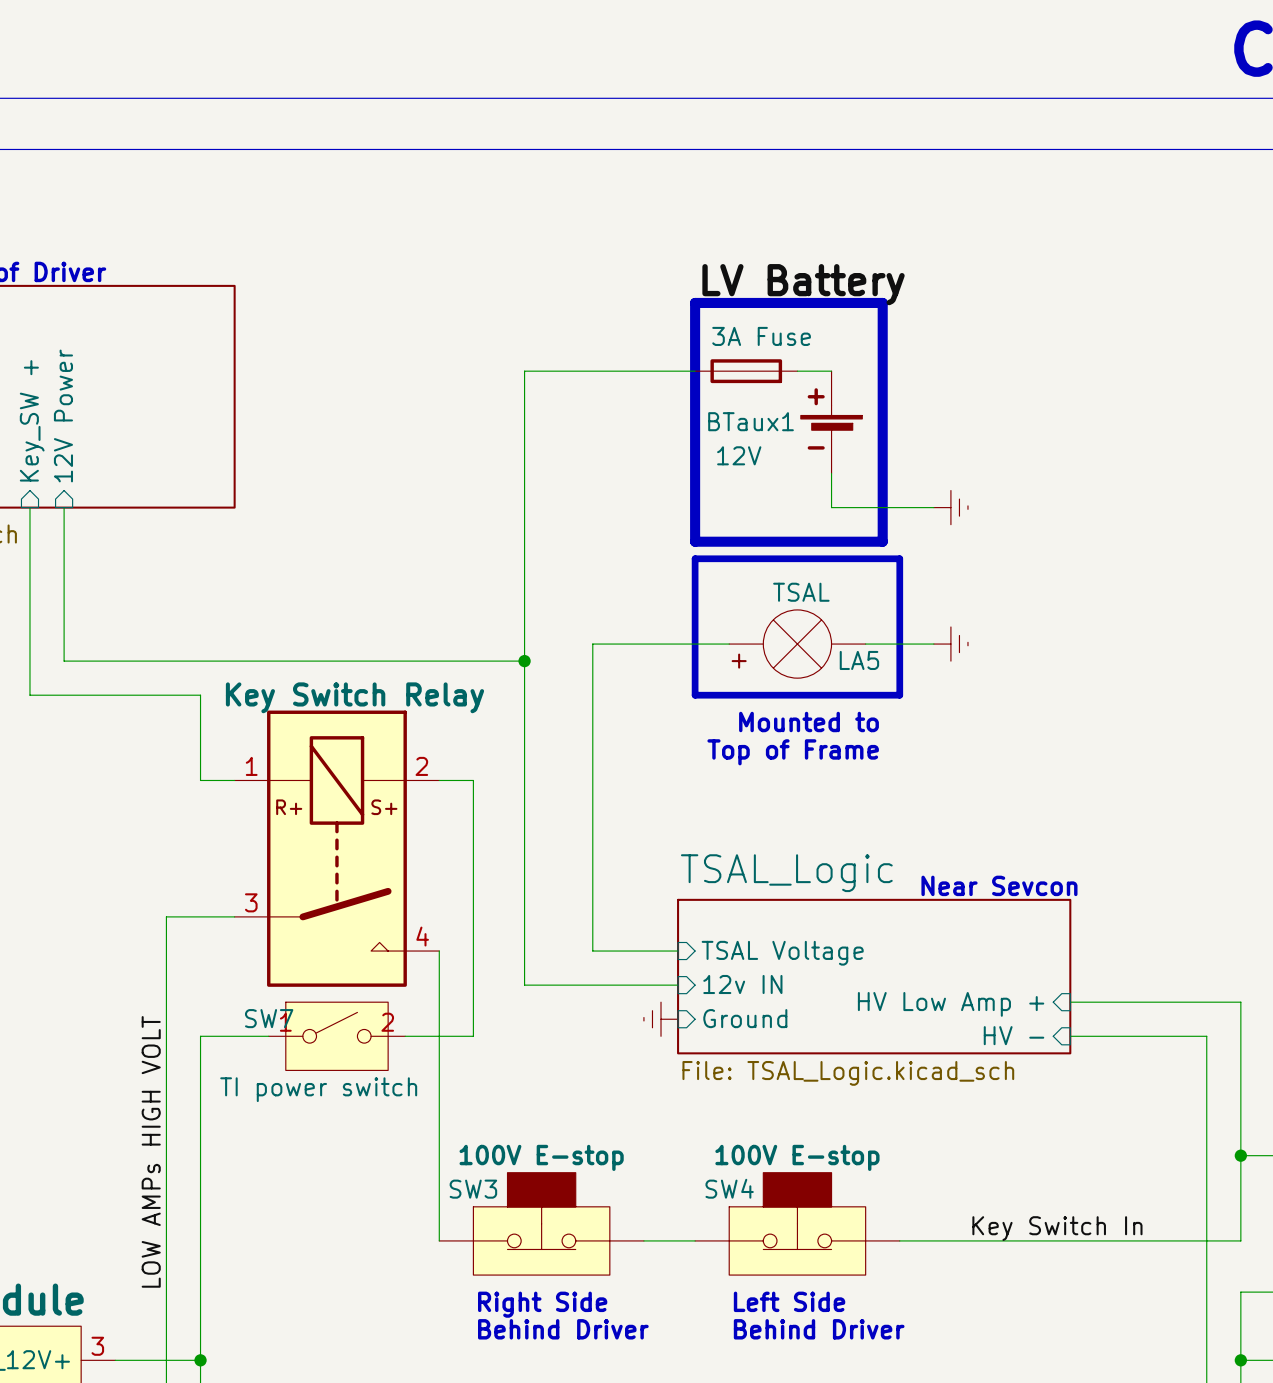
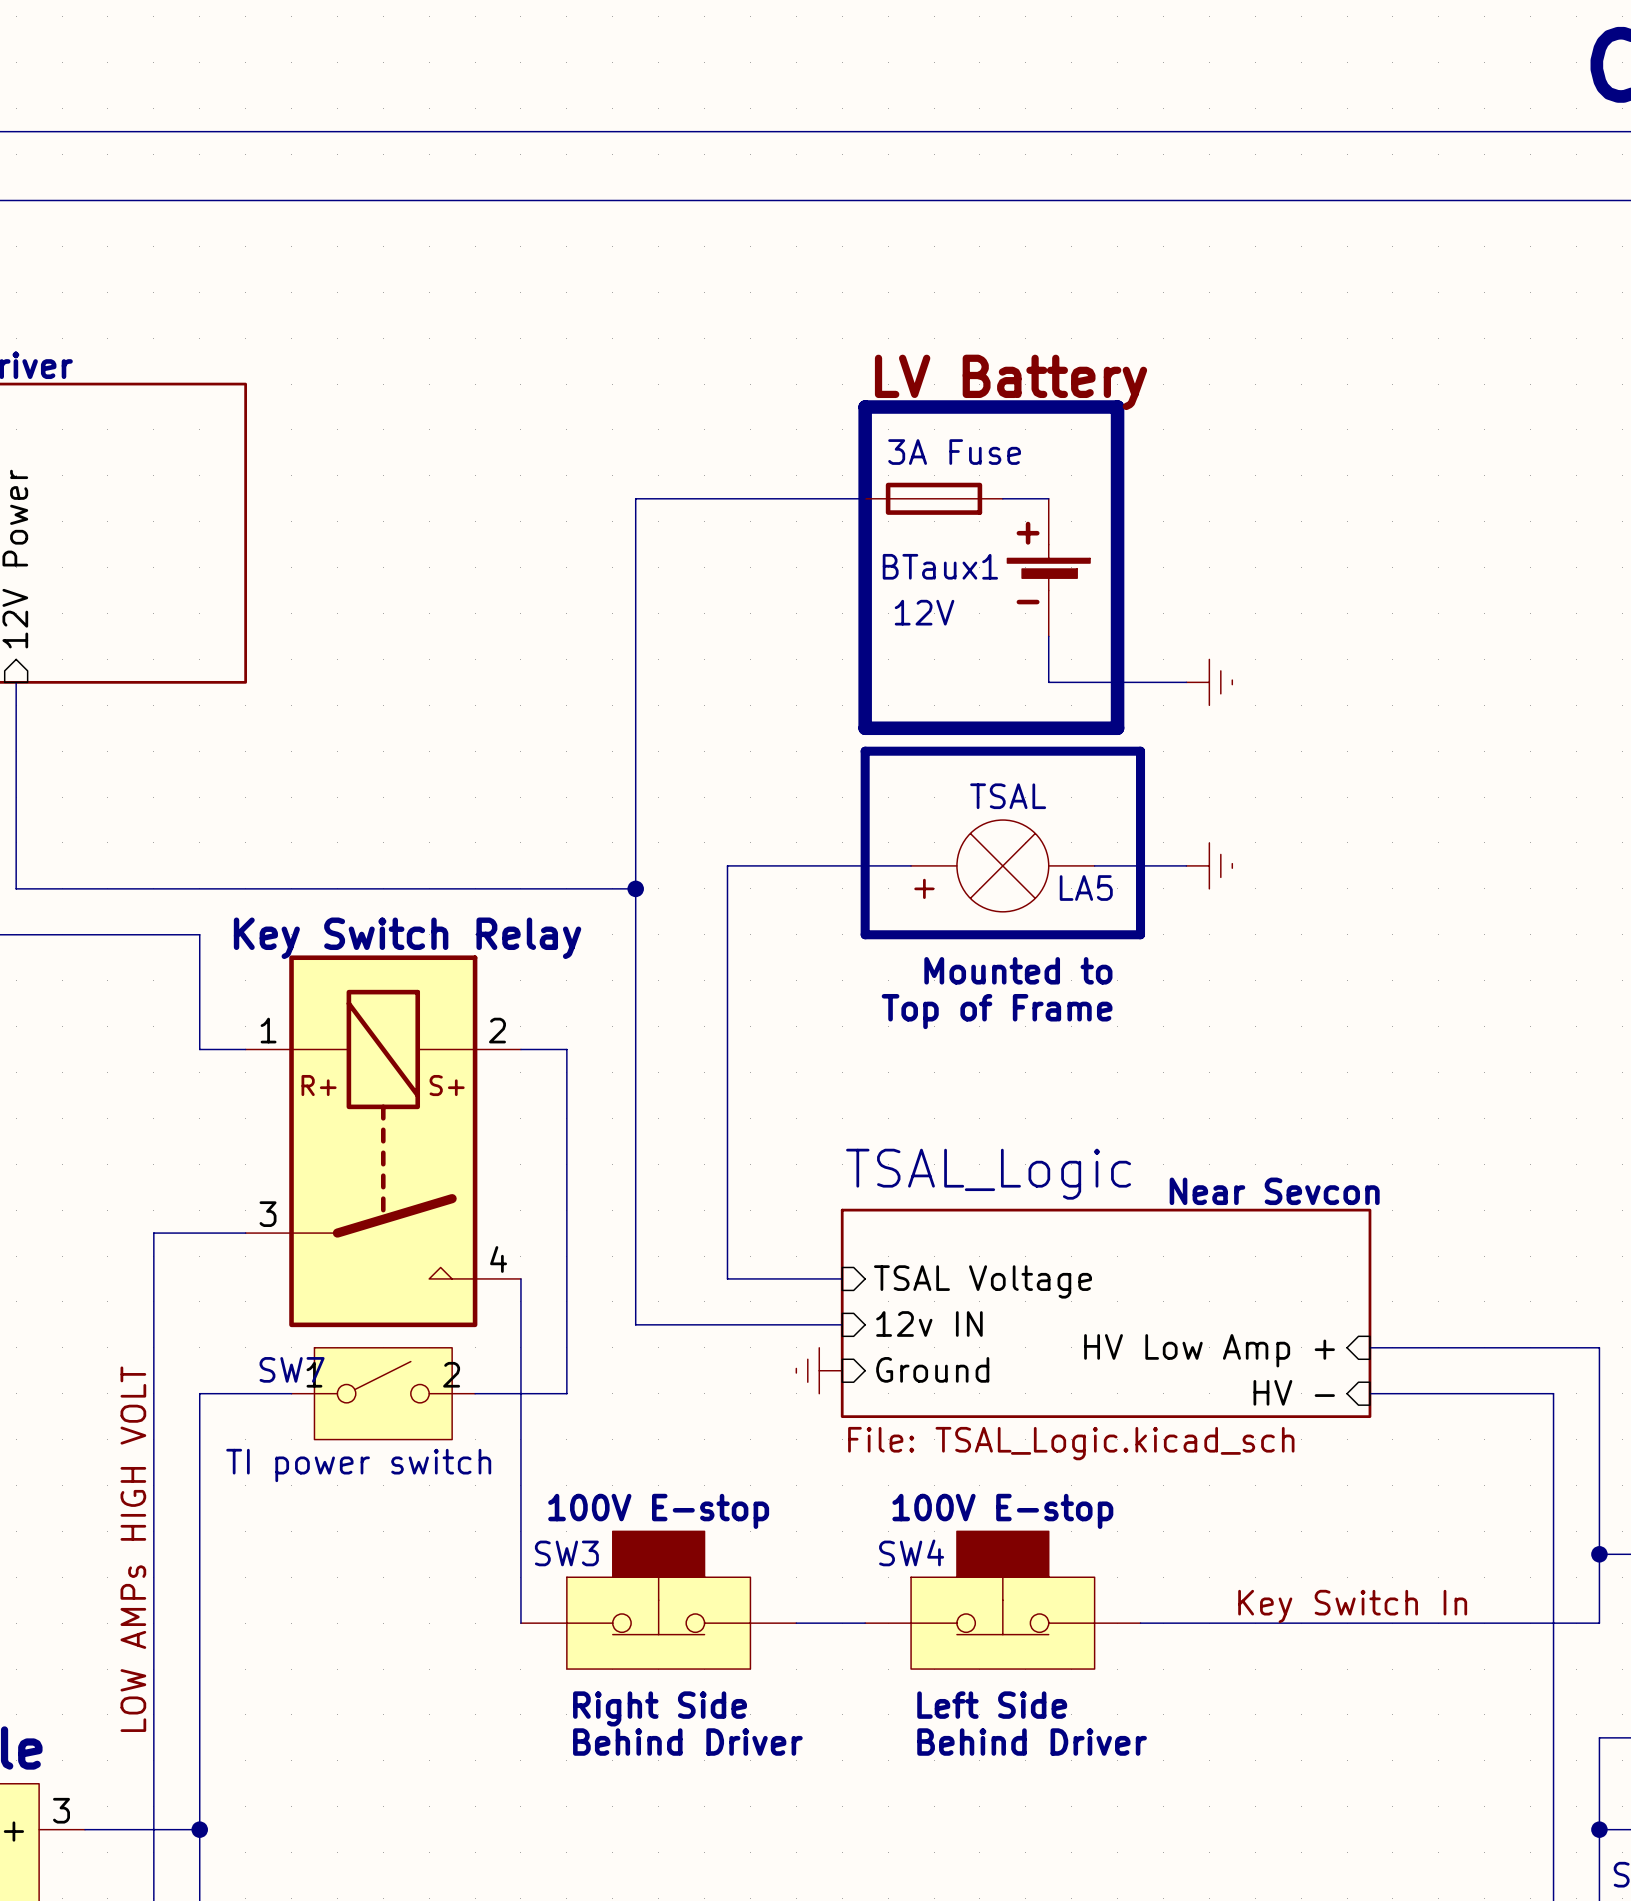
wire: (439, 1206) (439, 1240) -> none
wire: (1240, 1206) (1240, 1240) (899, 1240) -> (1599, 1623) (1140, 1623)
SW3 position: (541, 1223) -> (658, 1600)
SW4 position: (797, 1223) -> (1002, 1600)
label position: Key Switch In (1057, 1228) -> Key Switch In (1352, 1606)
wire: (643, 1240) (695, 1240) -> (796, 1623) (865, 1623)
text position: Left Side (789, 1301) -> Left Side (992, 1705)
text position: Right Side (542, 1304) -> Right Side (660, 1708)
text position: Behind Driver (563, 1329) -> Behind Driver (687, 1742)
text position: Behind Driver (819, 1329) -> Behind Driver (1032, 1742)

